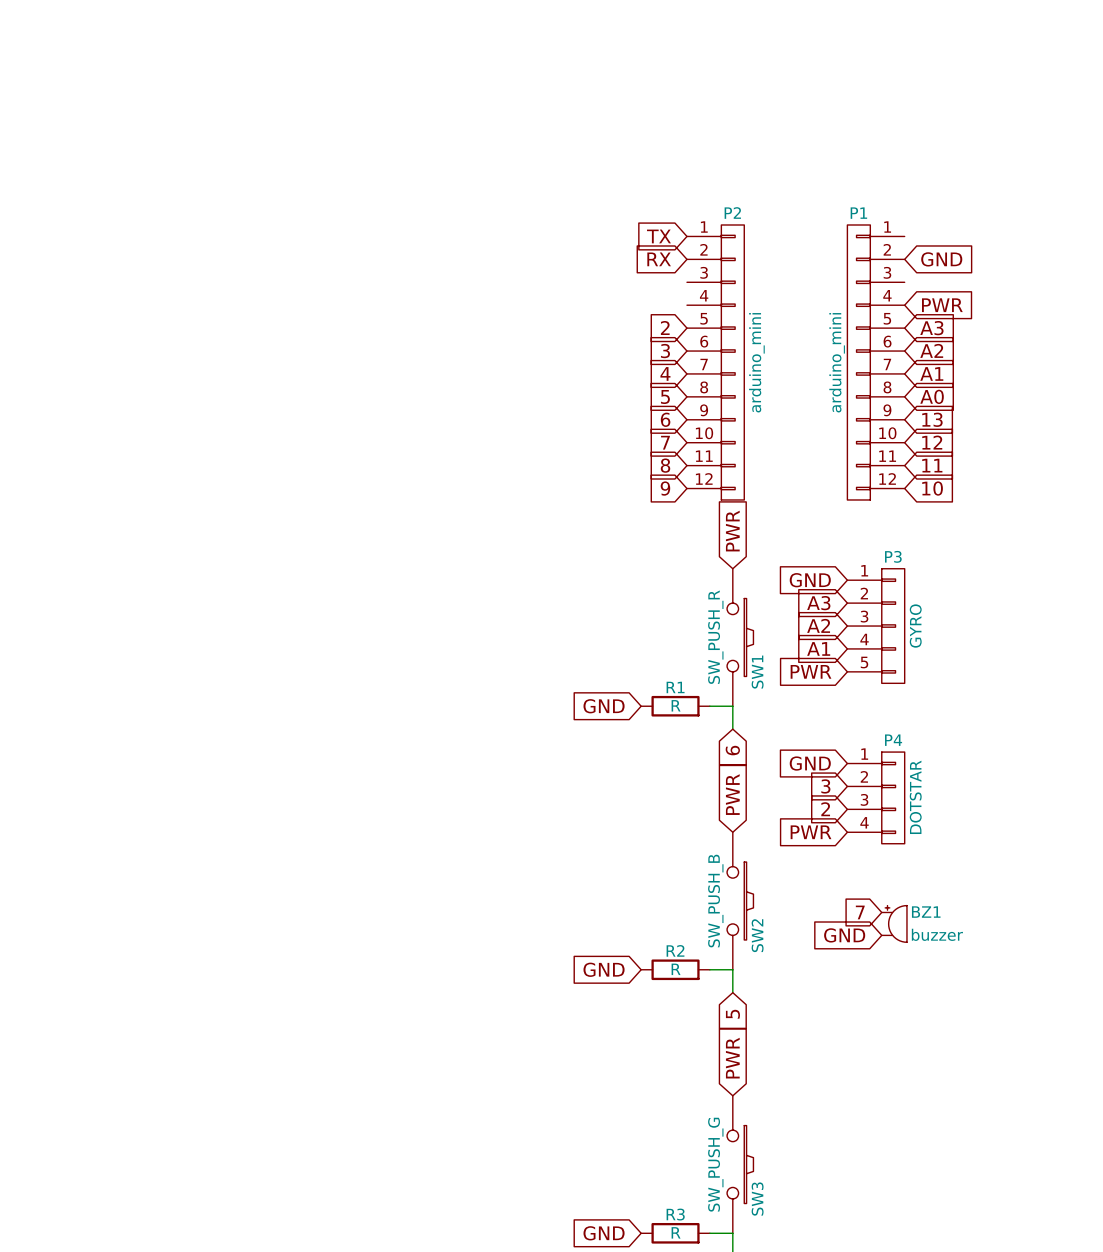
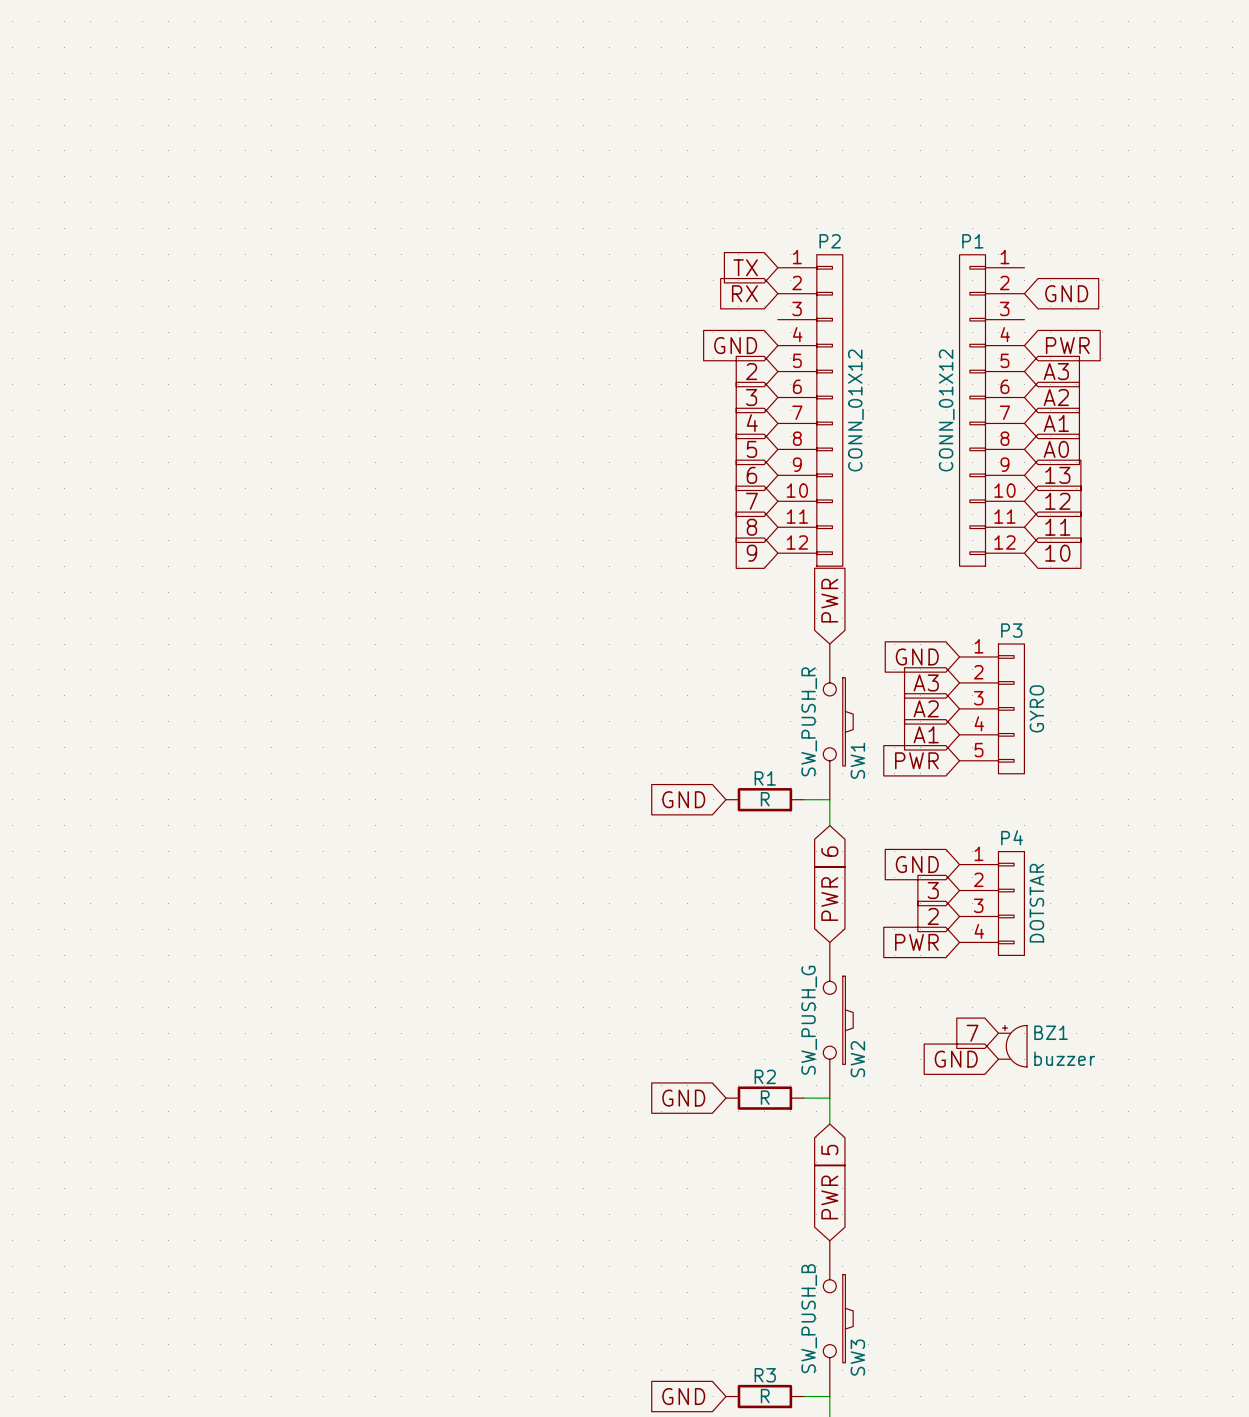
global label: none -> GND (735, 345)
P2 value: arduino_mini (756, 362) -> CONN_01X12 (855, 410)
P1 value: arduino_mini (837, 362) -> CONN_01X12 (946, 410)
SW2 value: SW_PUSH_B (715, 901) -> SW_PUSH_G (809, 1020)
SW3 value: SW_PUSH_G (715, 1164) -> SW_PUSH_B (809, 1318)

